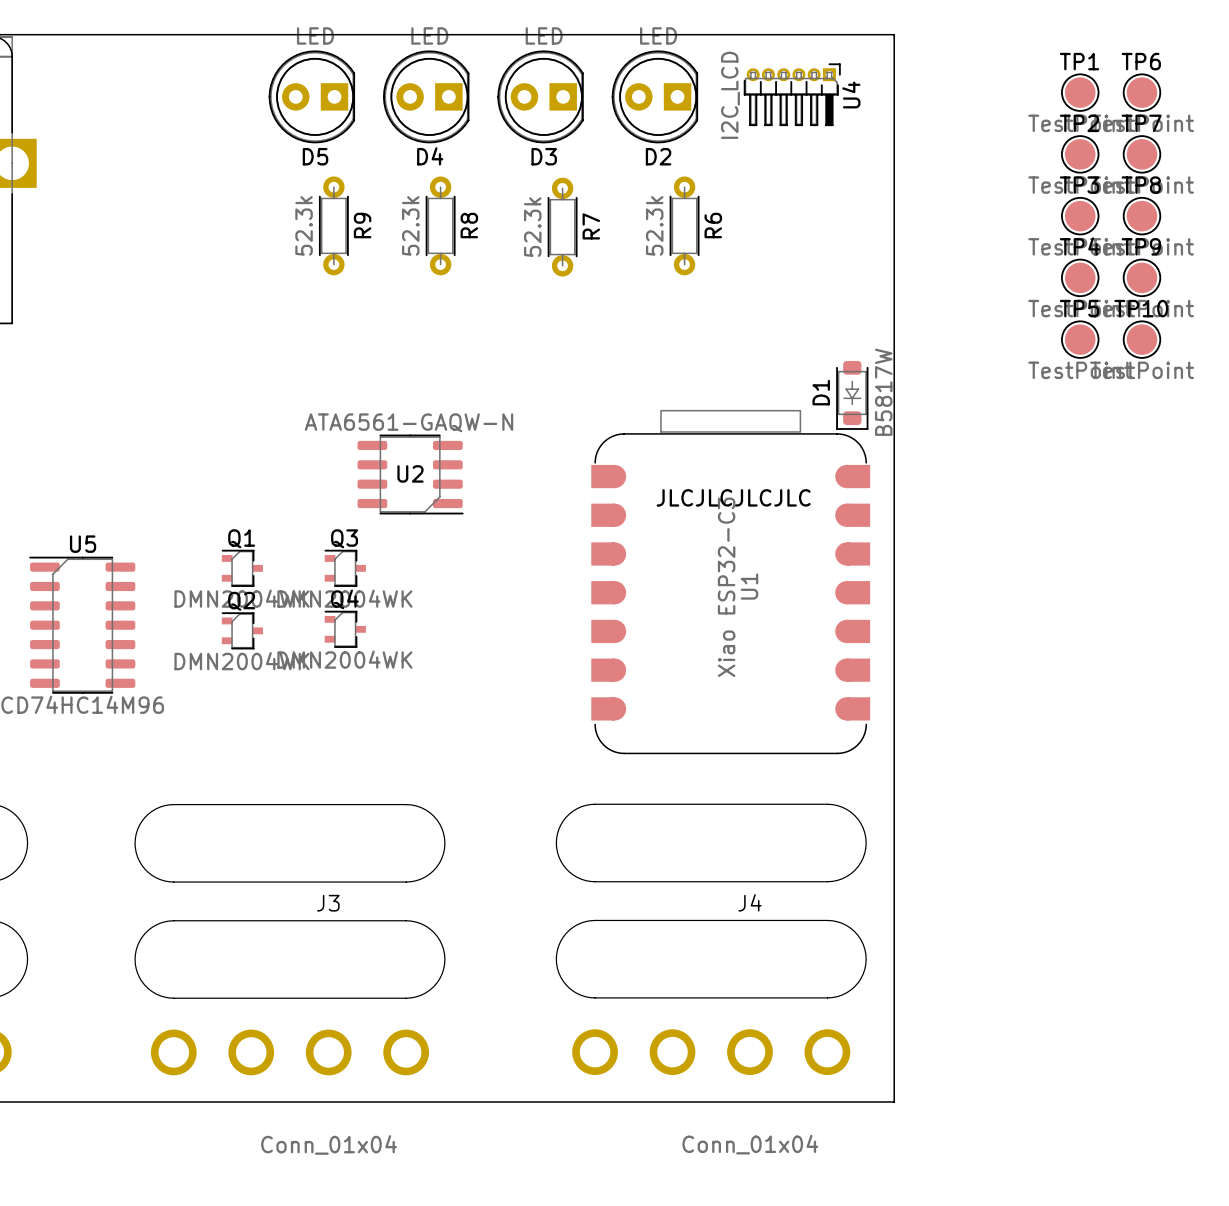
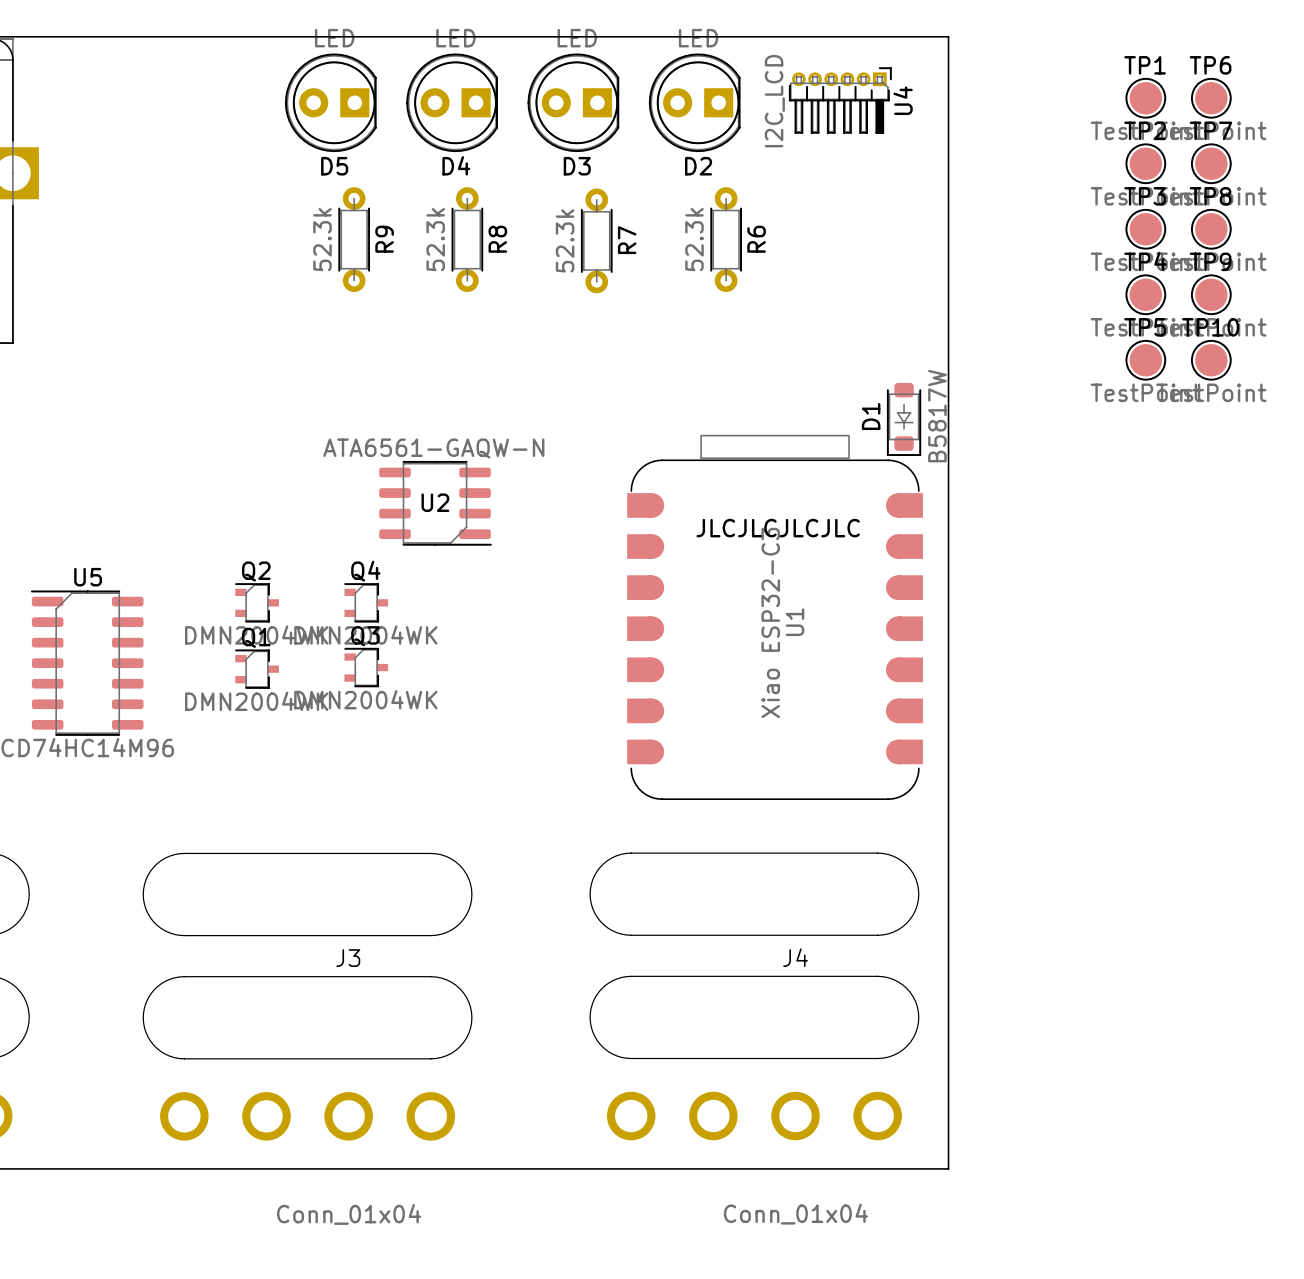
Q1 name: Q1 (241, 538) -> Q2 (256, 571)
Q3 name: Q3 (344, 538) -> Q4 (365, 571)
Q4 name: Q4 (344, 599) -> Q3 (365, 636)
Q2 name: Q2 (241, 601) -> Q1 (256, 637)

